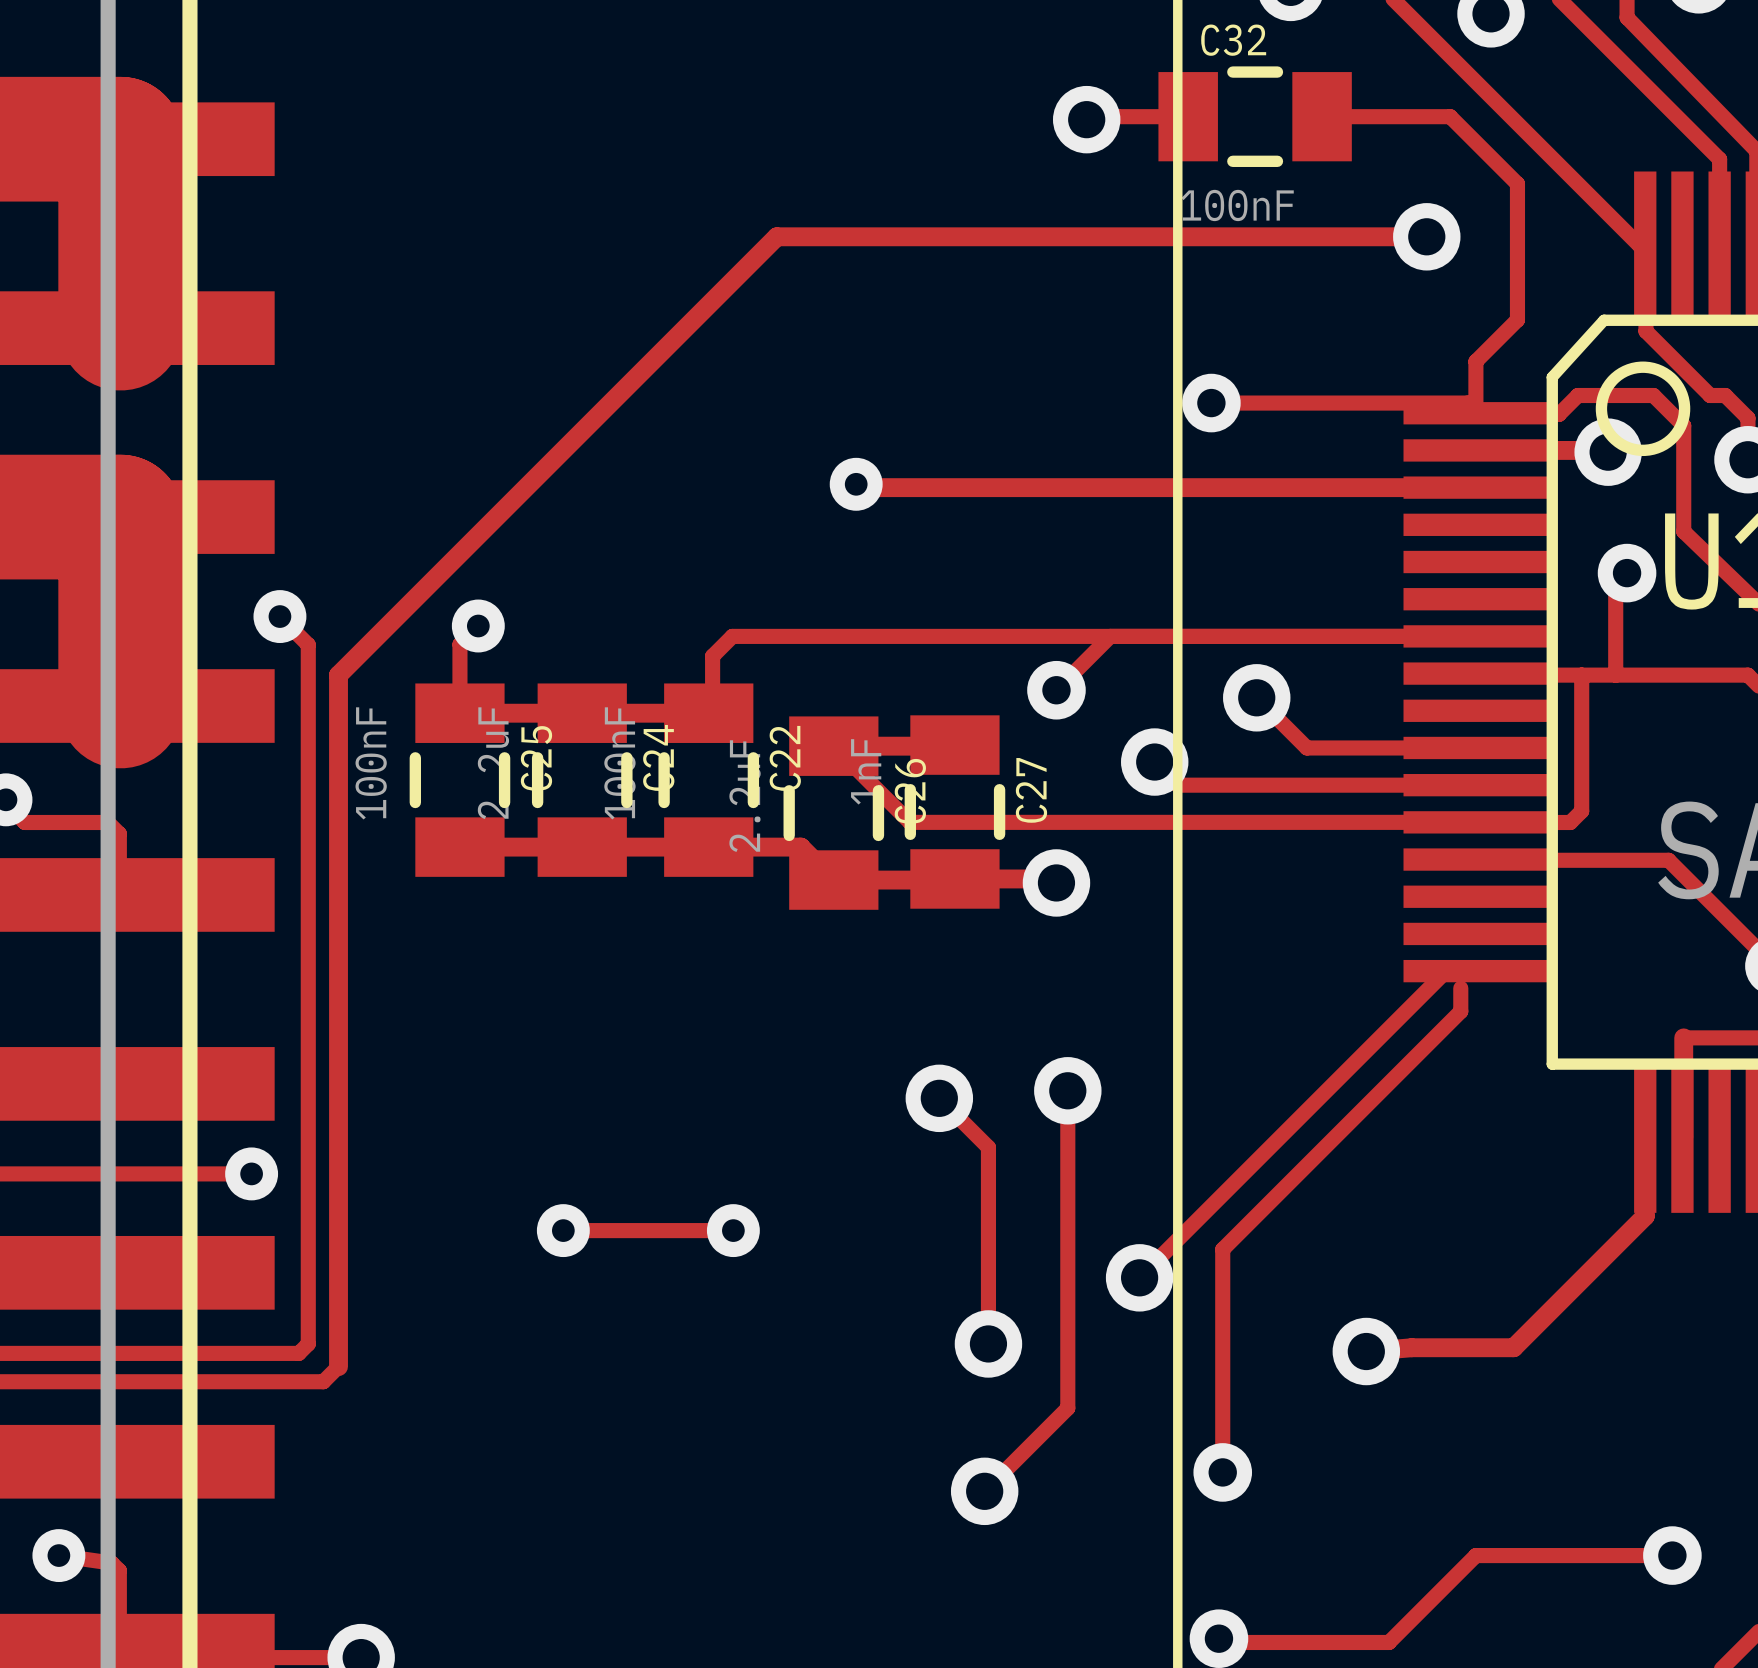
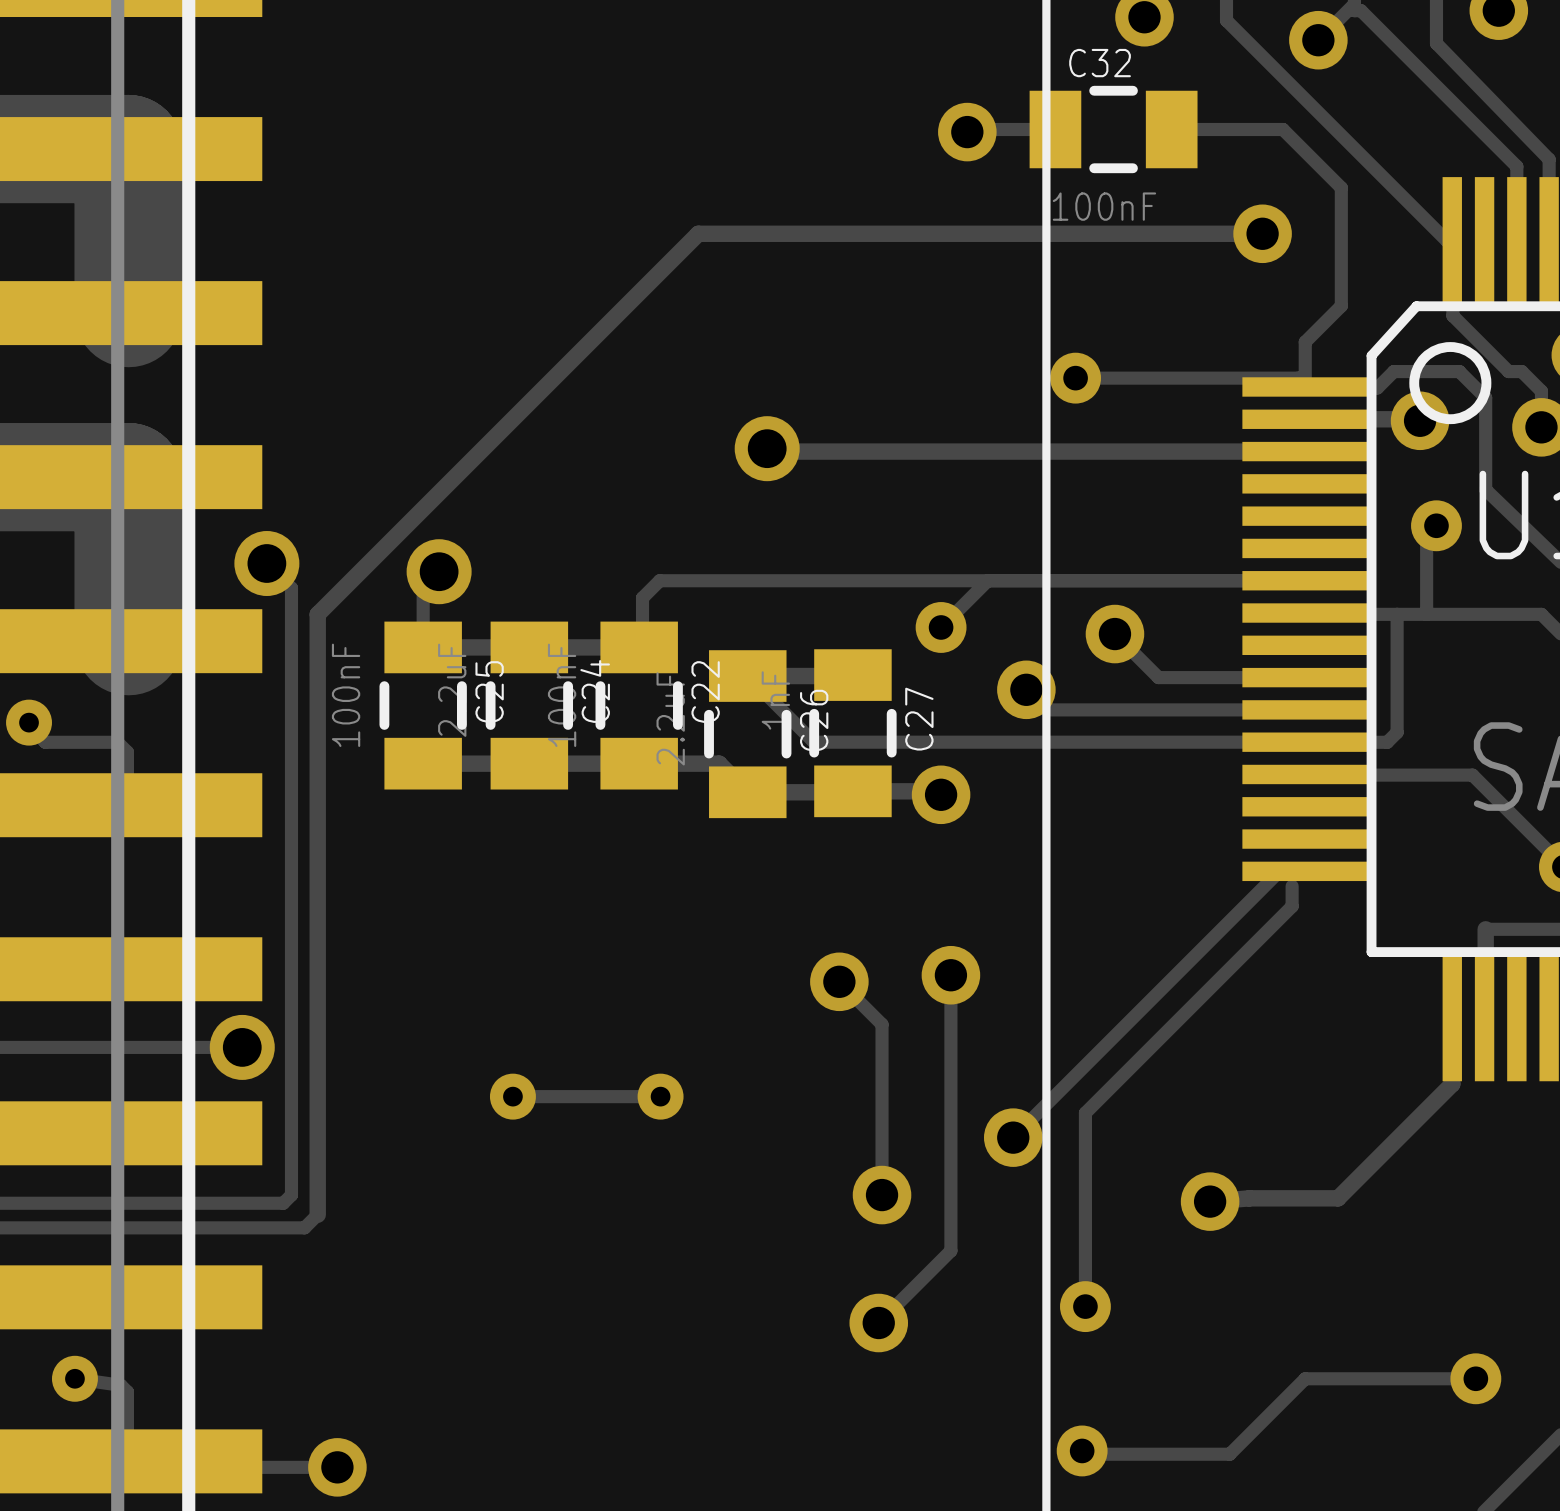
via size: [829, 457, 883, 511] -> [734, 416, 800, 482]
via size: [253, 590, 307, 644] -> [234, 531, 300, 597]
via size: [451, 599, 505, 653] -> [406, 539, 472, 605]
via size: [225, 1147, 279, 1201] -> [209, 1014, 275, 1080]

